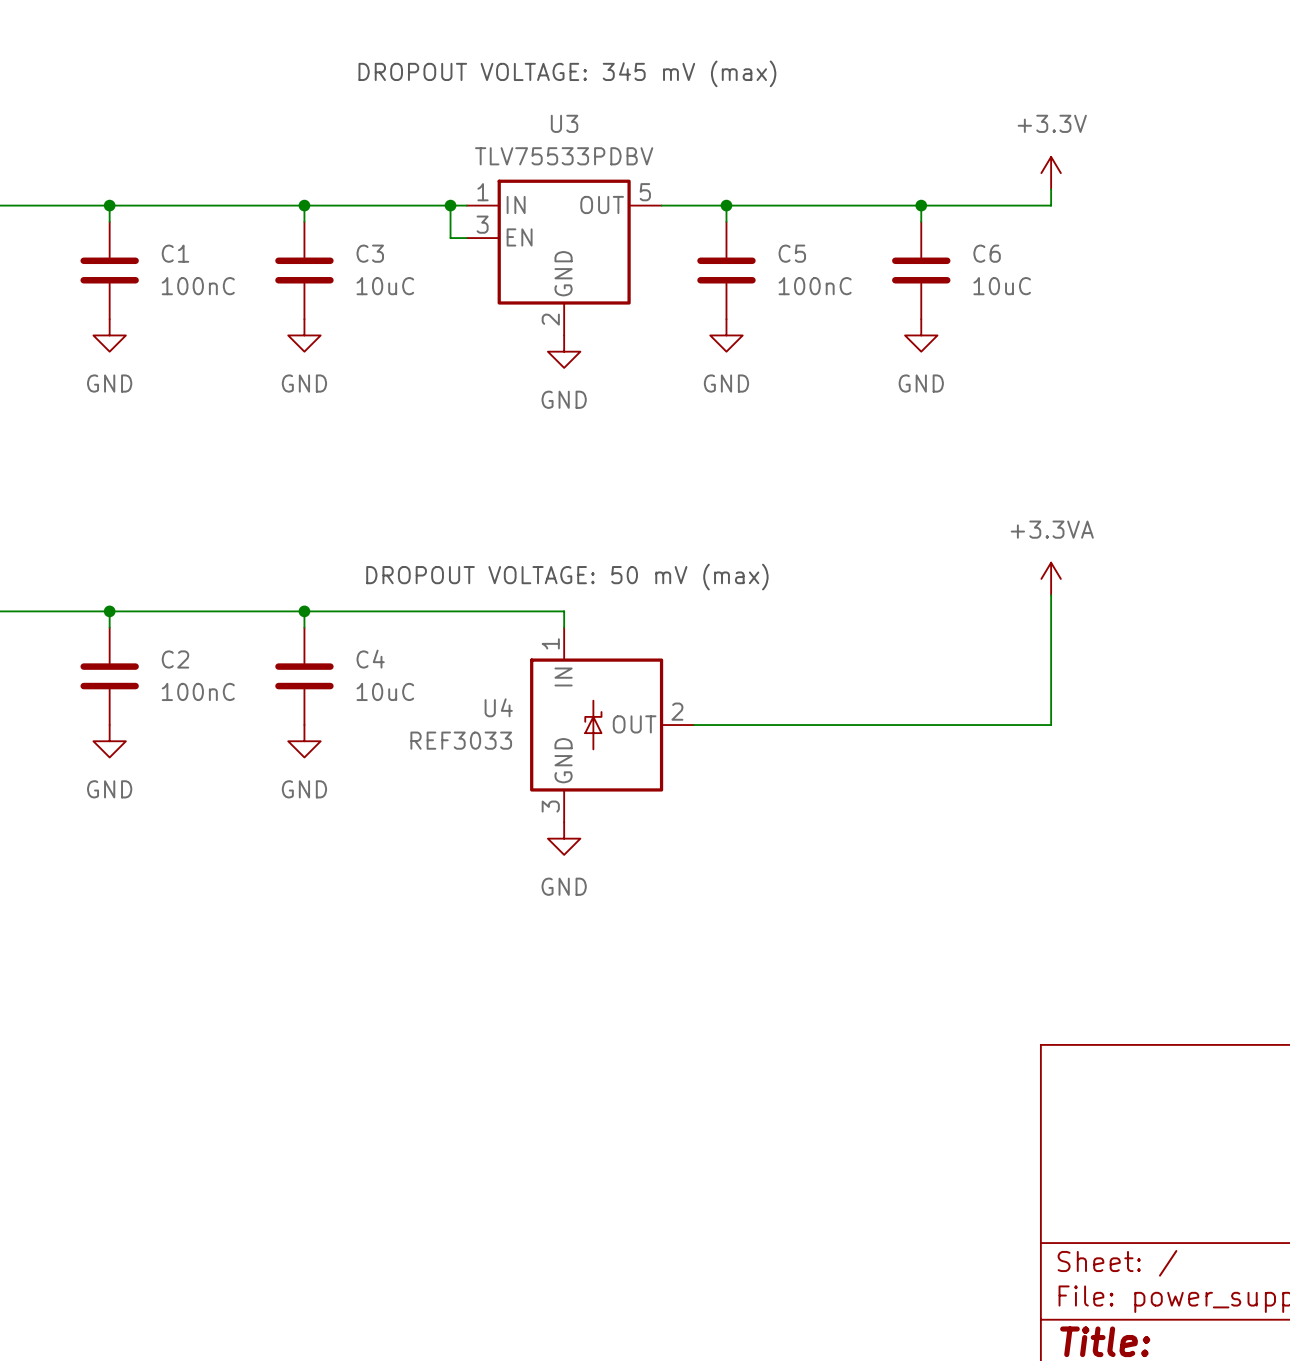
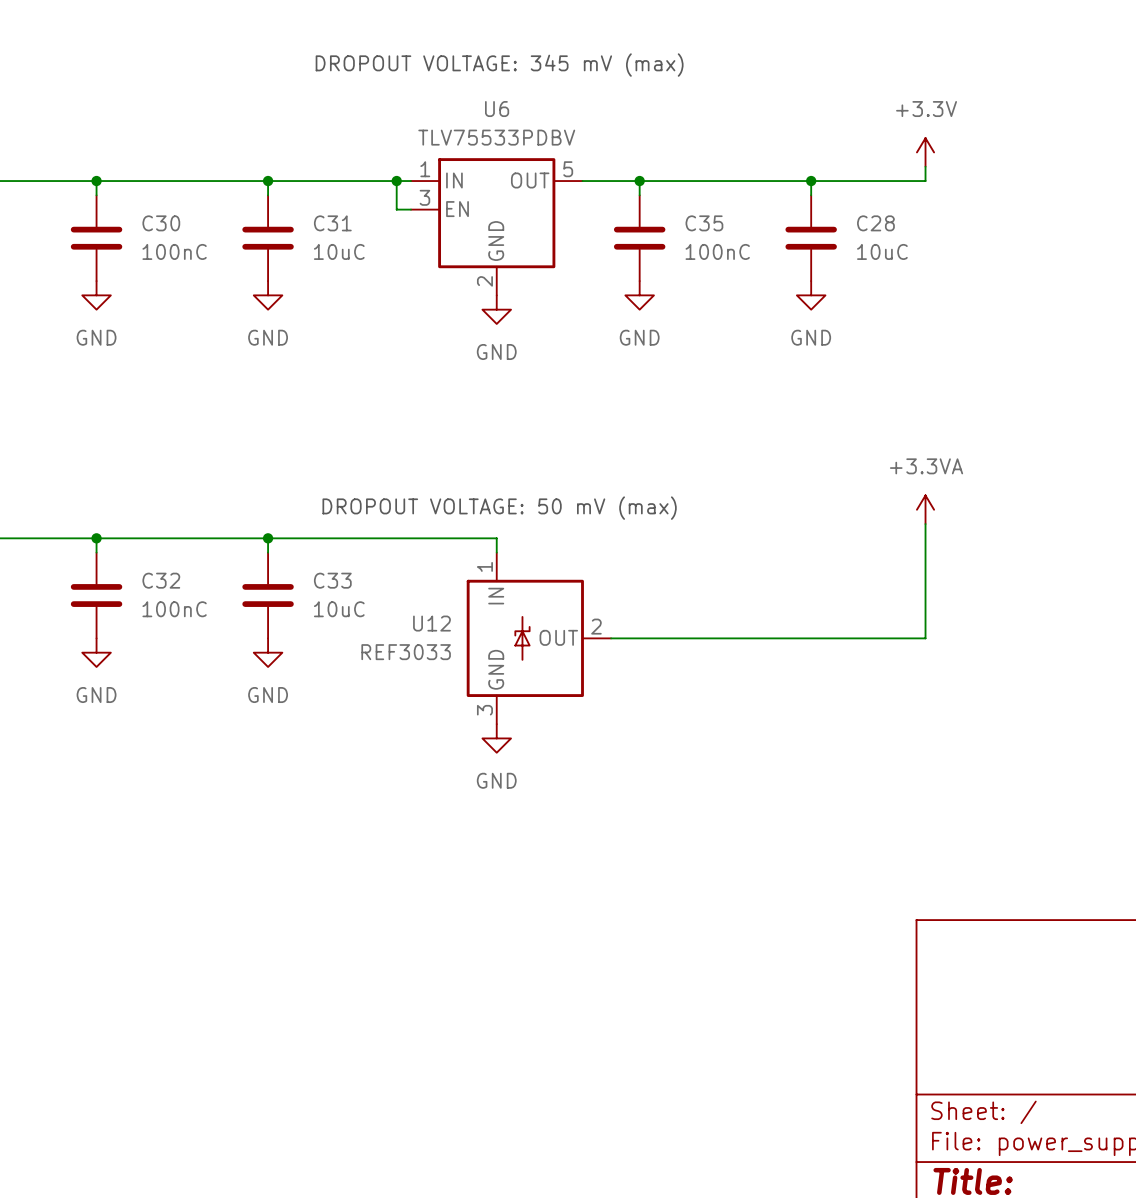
U3 name: U3 (564, 123) -> U6 (497, 109)
C1 name: C1 (175, 253) -> C30 (161, 223)
C3 name: C3 (370, 253) -> C31 (332, 223)
C5 name: C5 (792, 253) -> C35 (704, 223)
C6 name: C6 (987, 253) -> C28 (875, 223)
C2 name: C2 (175, 659) -> C32 (161, 580)
C4 name: C4 (370, 659) -> C33 (332, 580)
U4 name: U4 (498, 707) -> U12 (431, 623)

